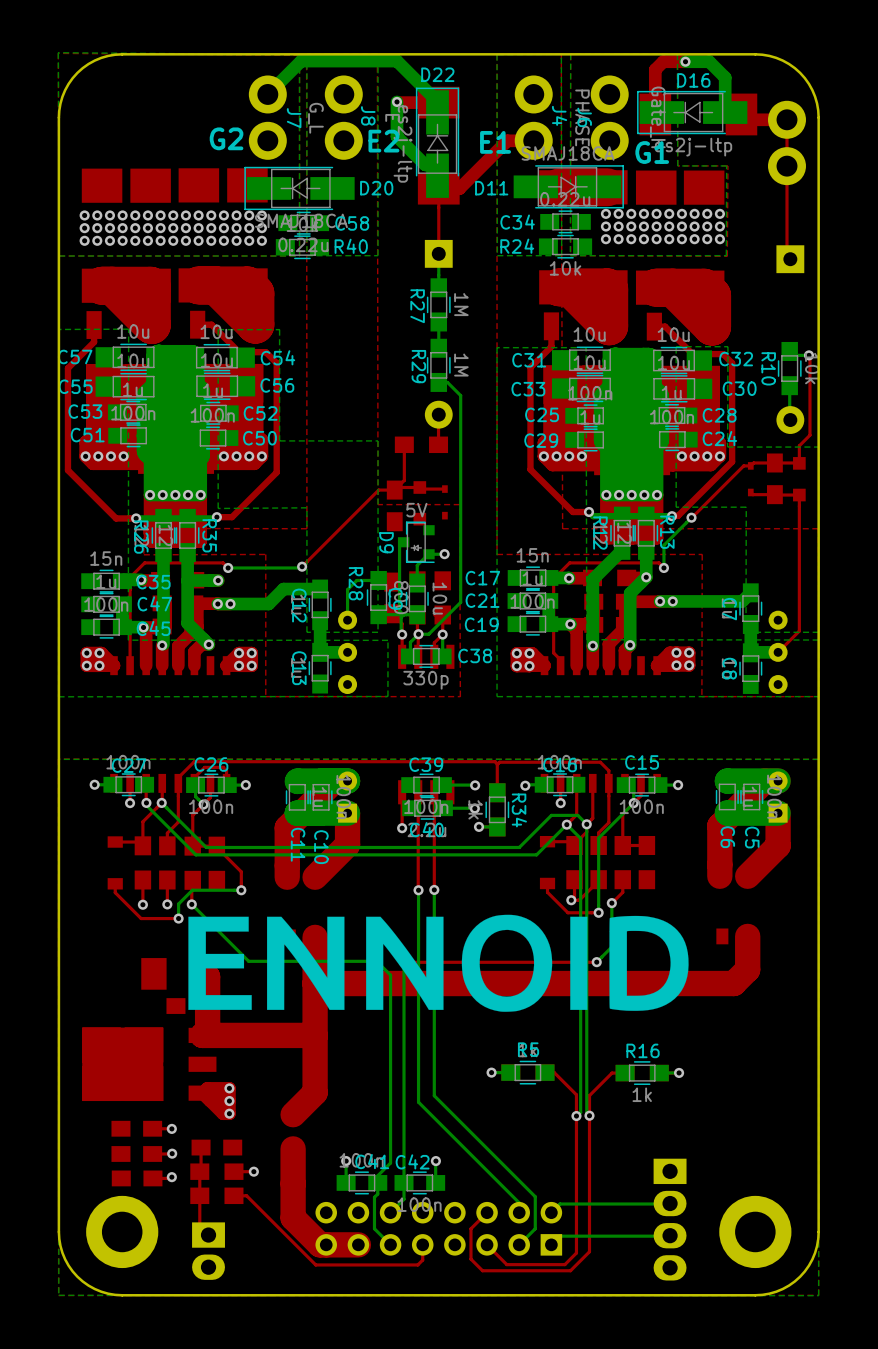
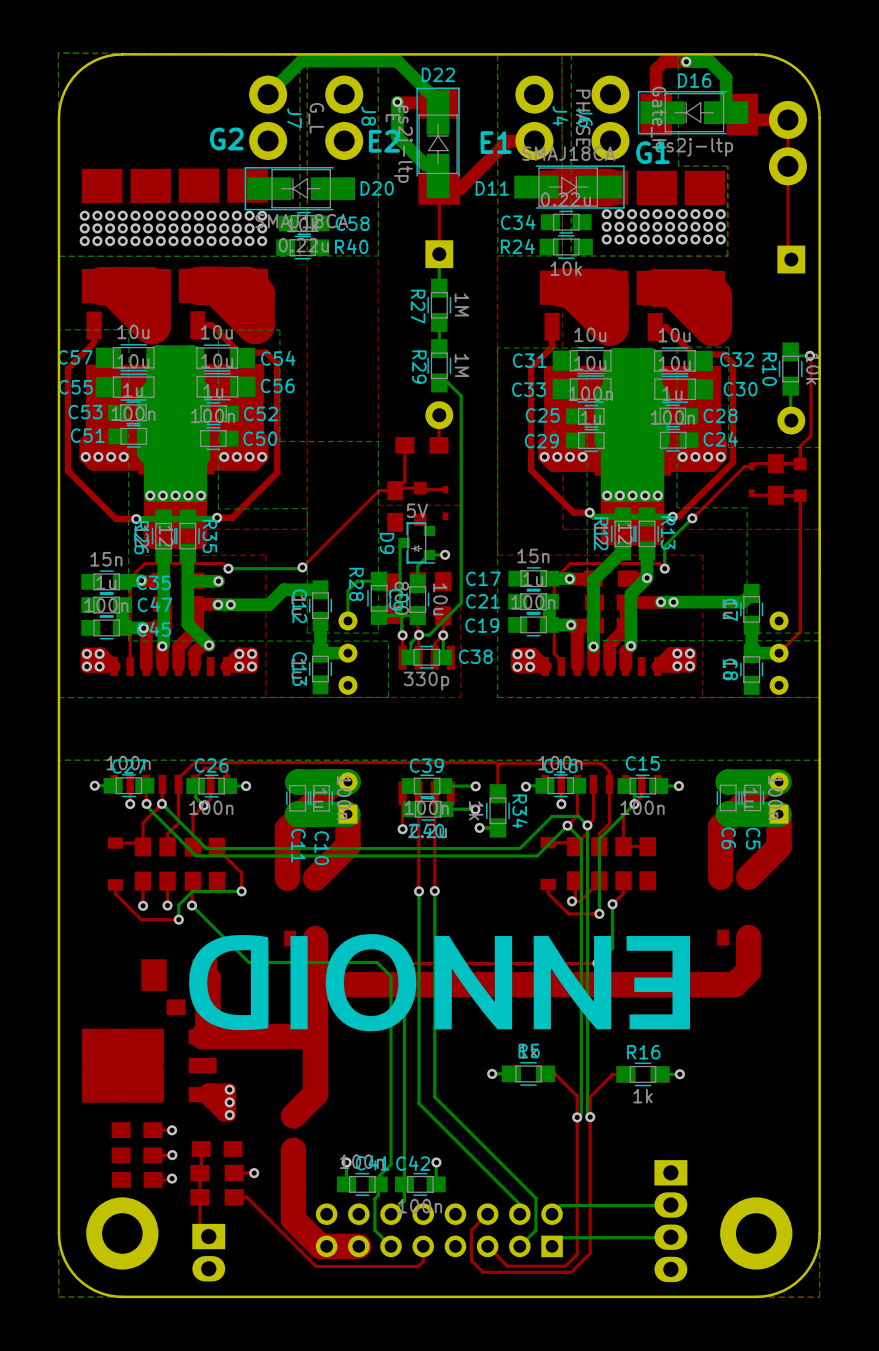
drawing: [188, 914, 689, 1012] -> none
drawing: none -> [189, 934, 691, 1032]

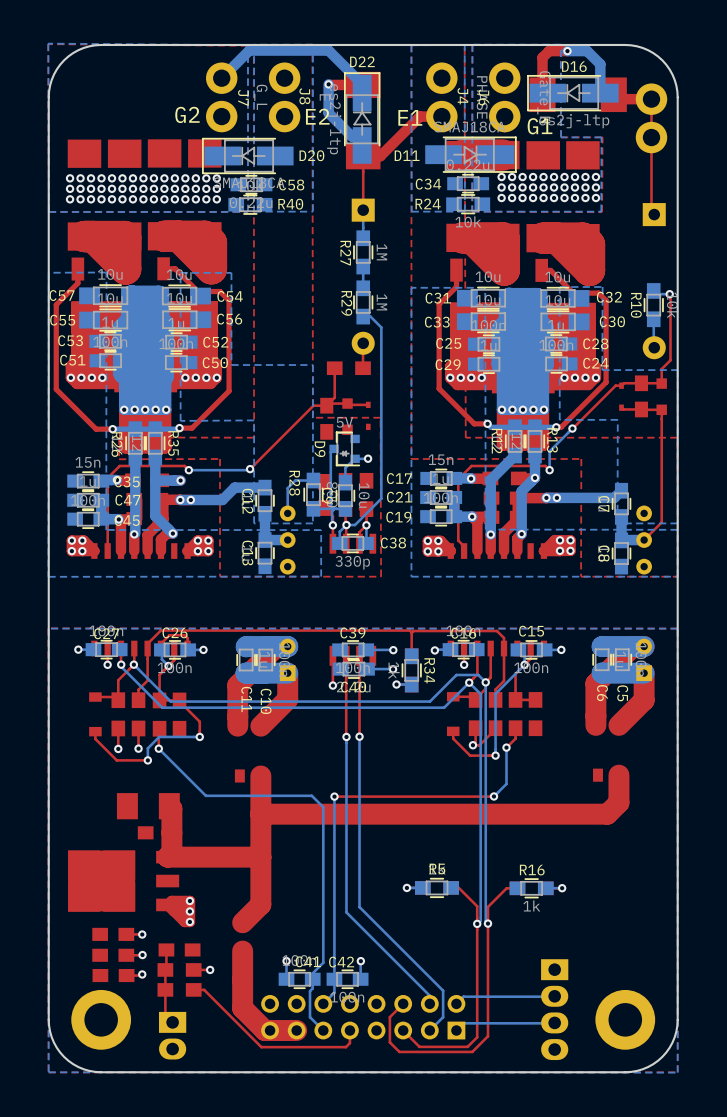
drawing: [189, 934, 691, 1032] -> none

